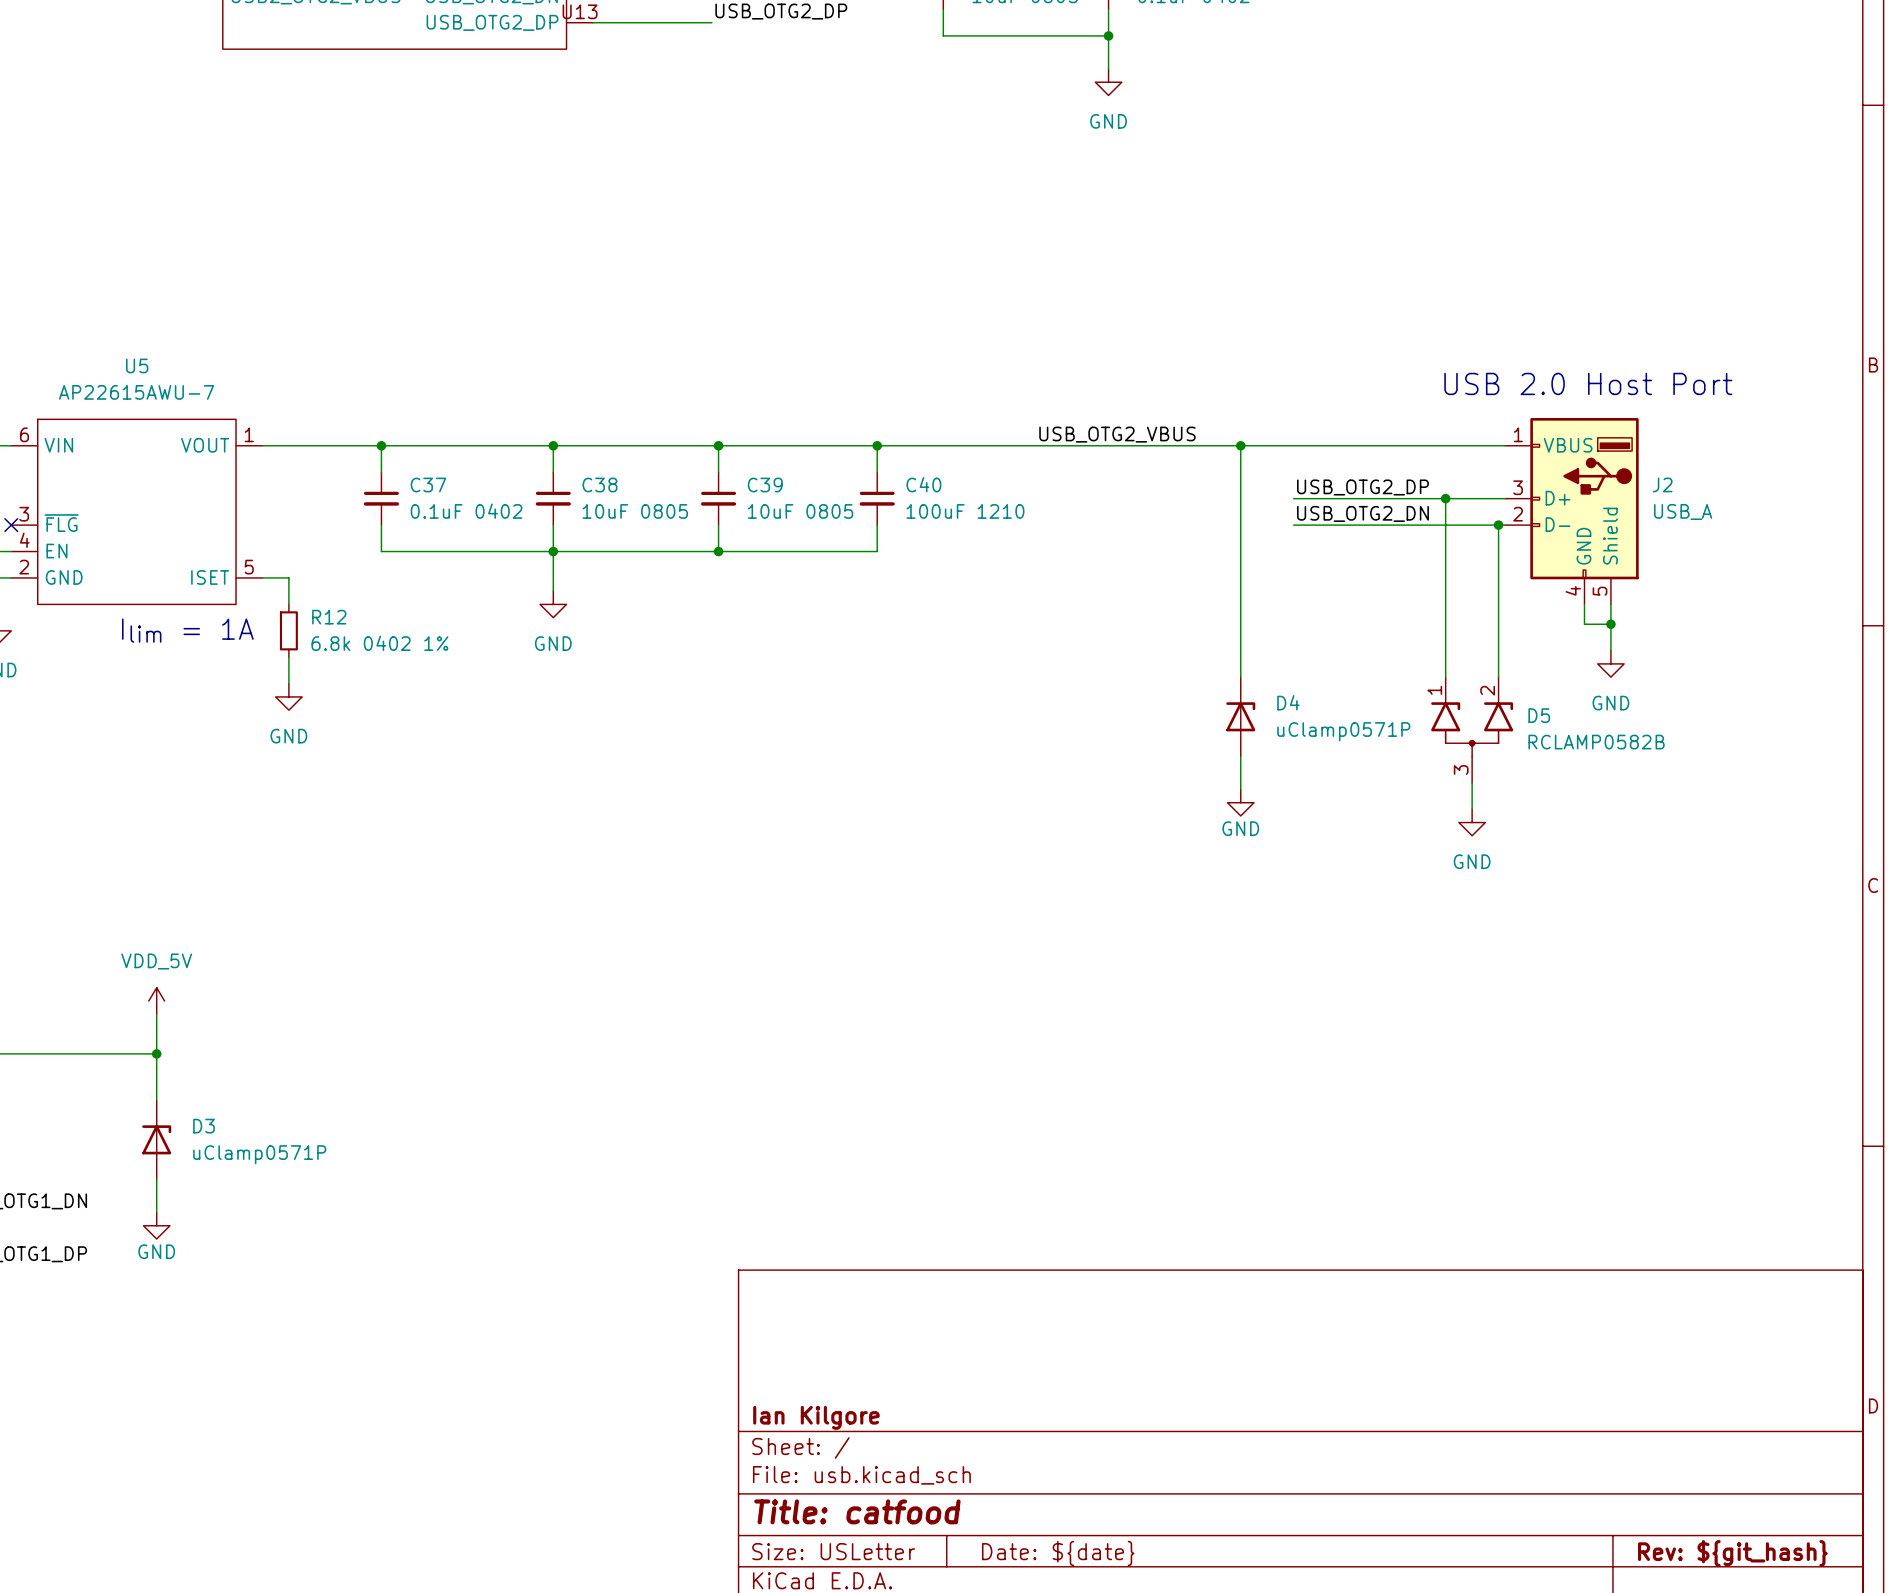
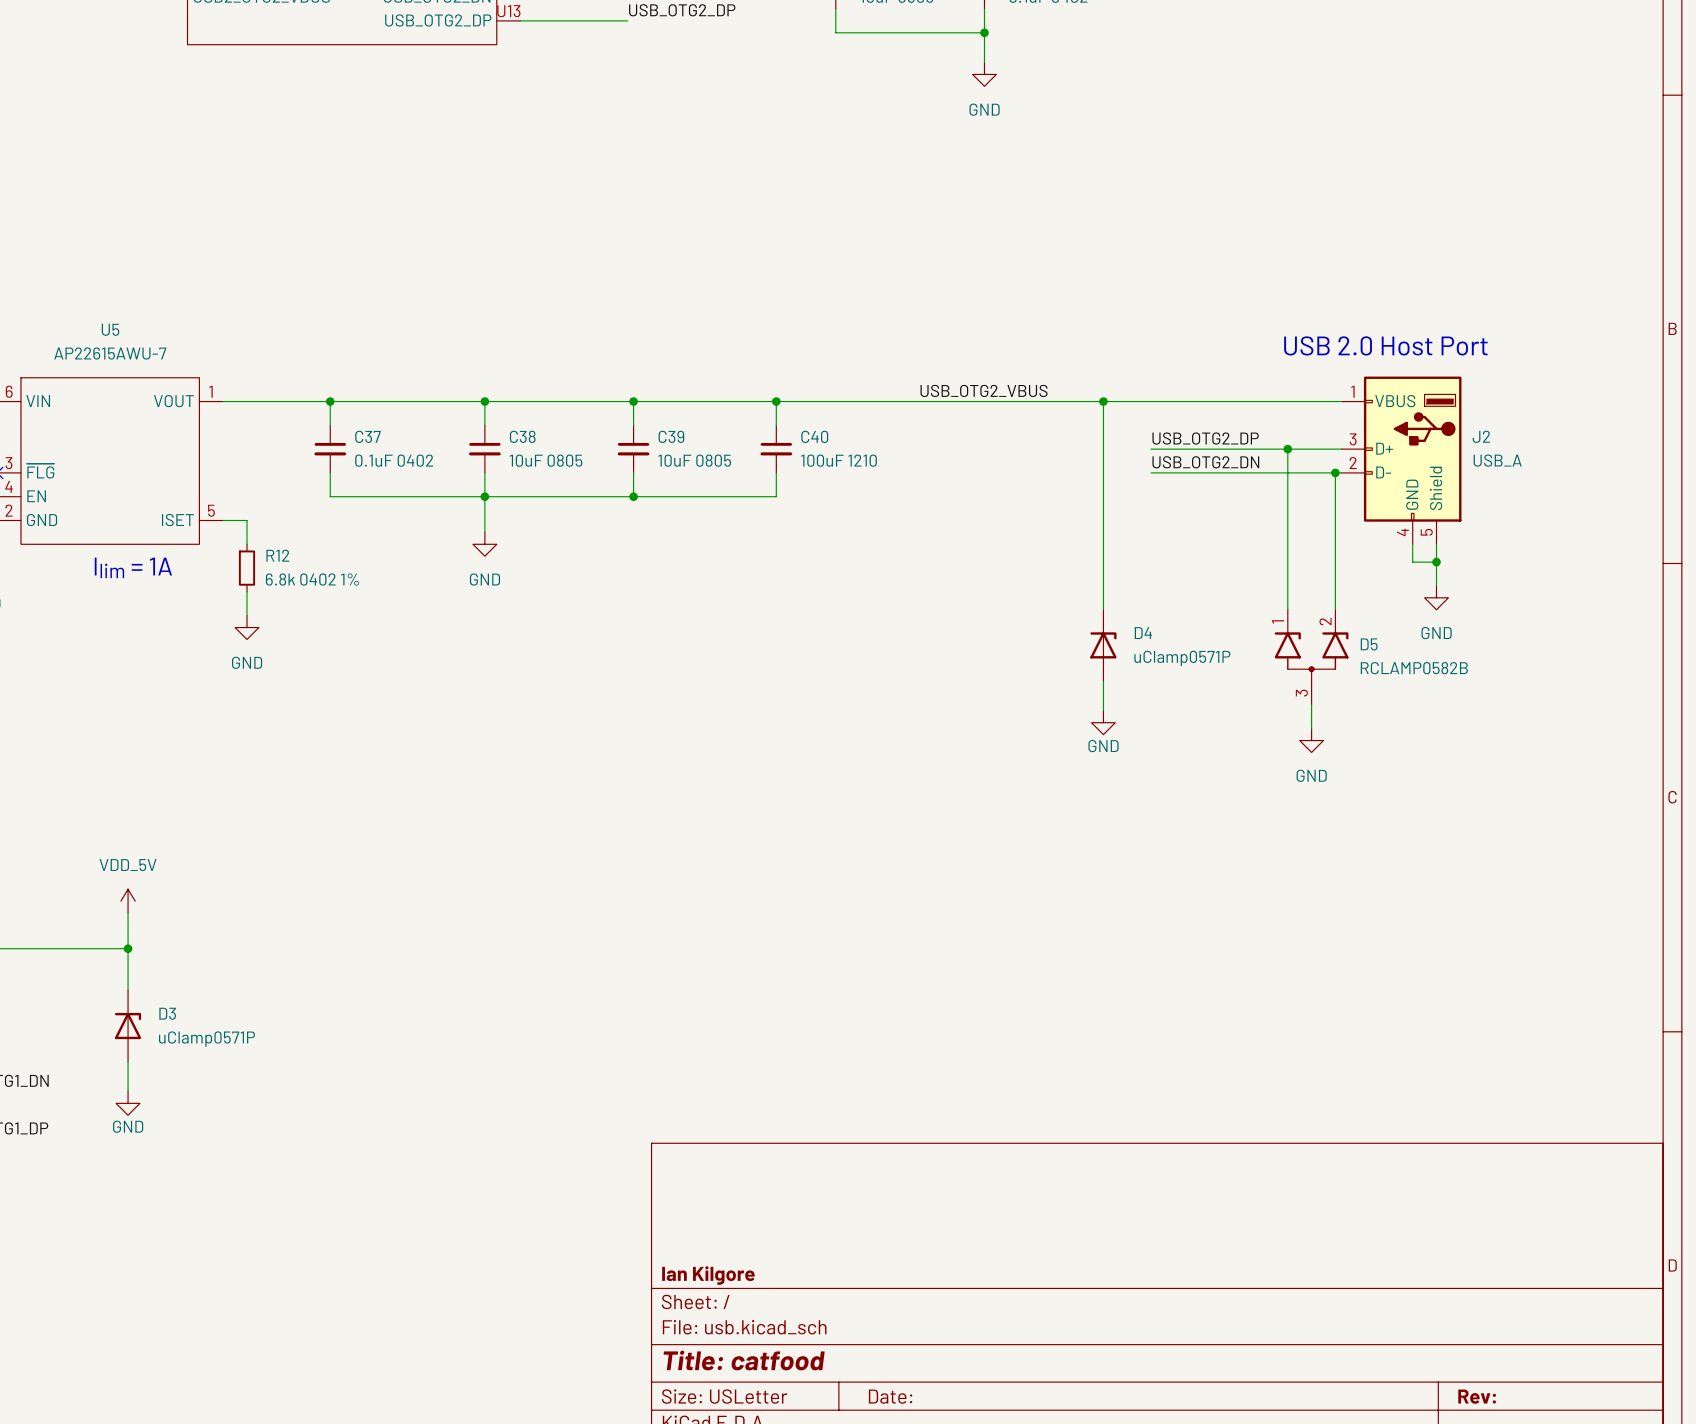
title block: Date: ${date} (1058, 1553) -> Date: (890, 1396)
title block: Rev: ${git_hash} (1732, 1553) -> Rev: (1477, 1396)

